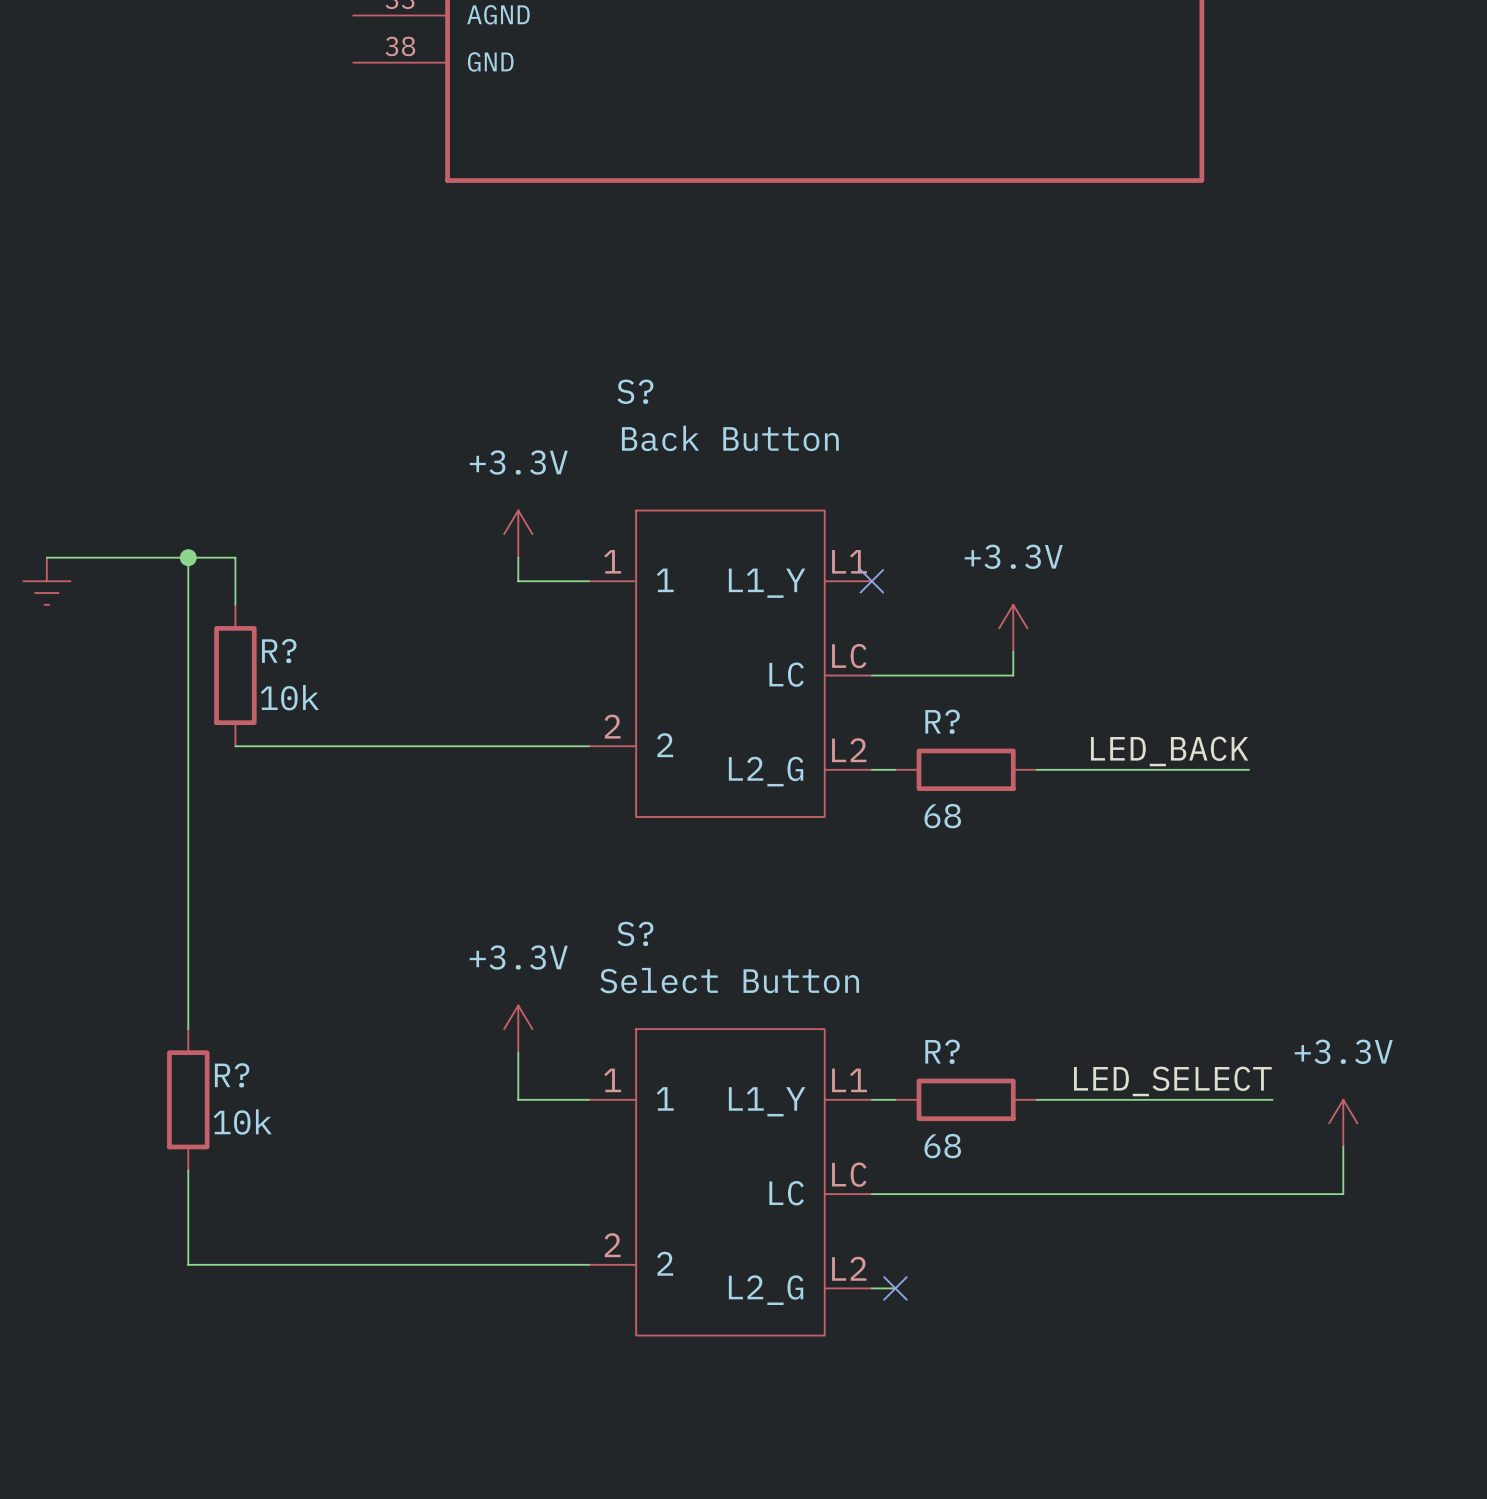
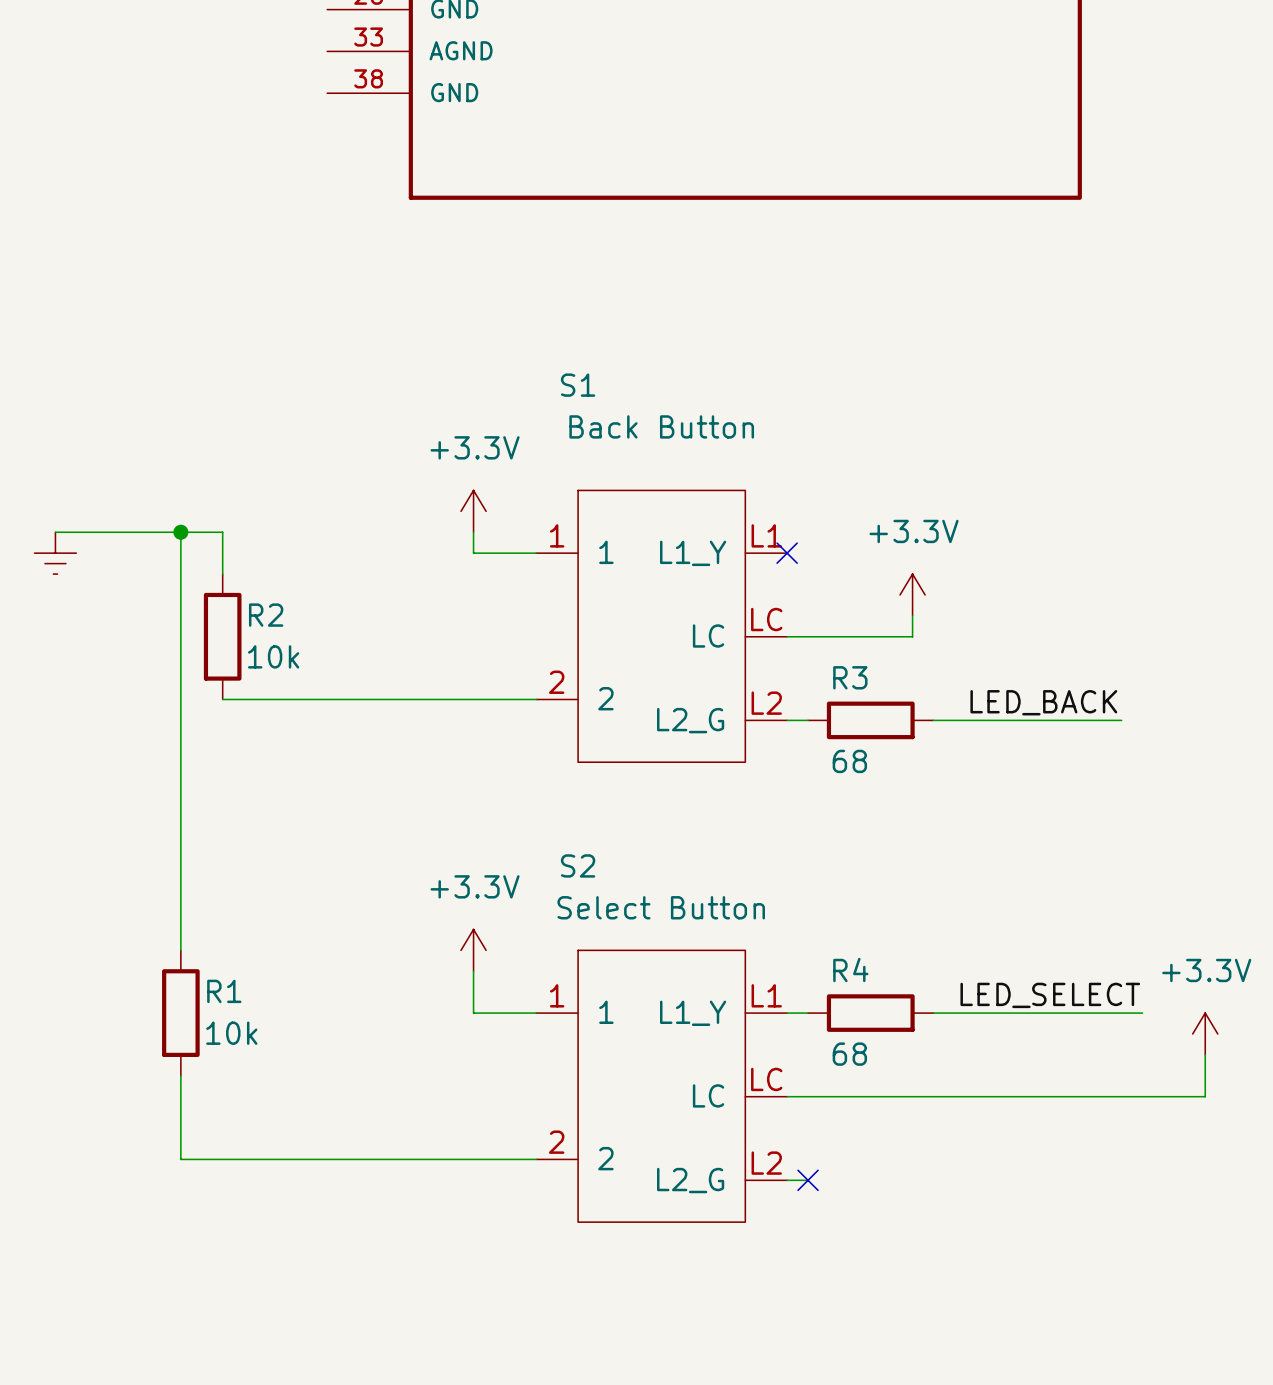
S? name: S? (635, 391) -> S1 (578, 385)
R? name: R? (279, 651) -> R2 (266, 615)
R? name: R? (942, 721) -> R3 (850, 677)
S? name: S? (635, 933) -> S2 (578, 865)
R? name: R? (942, 1051) -> R4 (850, 969)
R? name: R? (232, 1075) -> R1 (224, 991)

